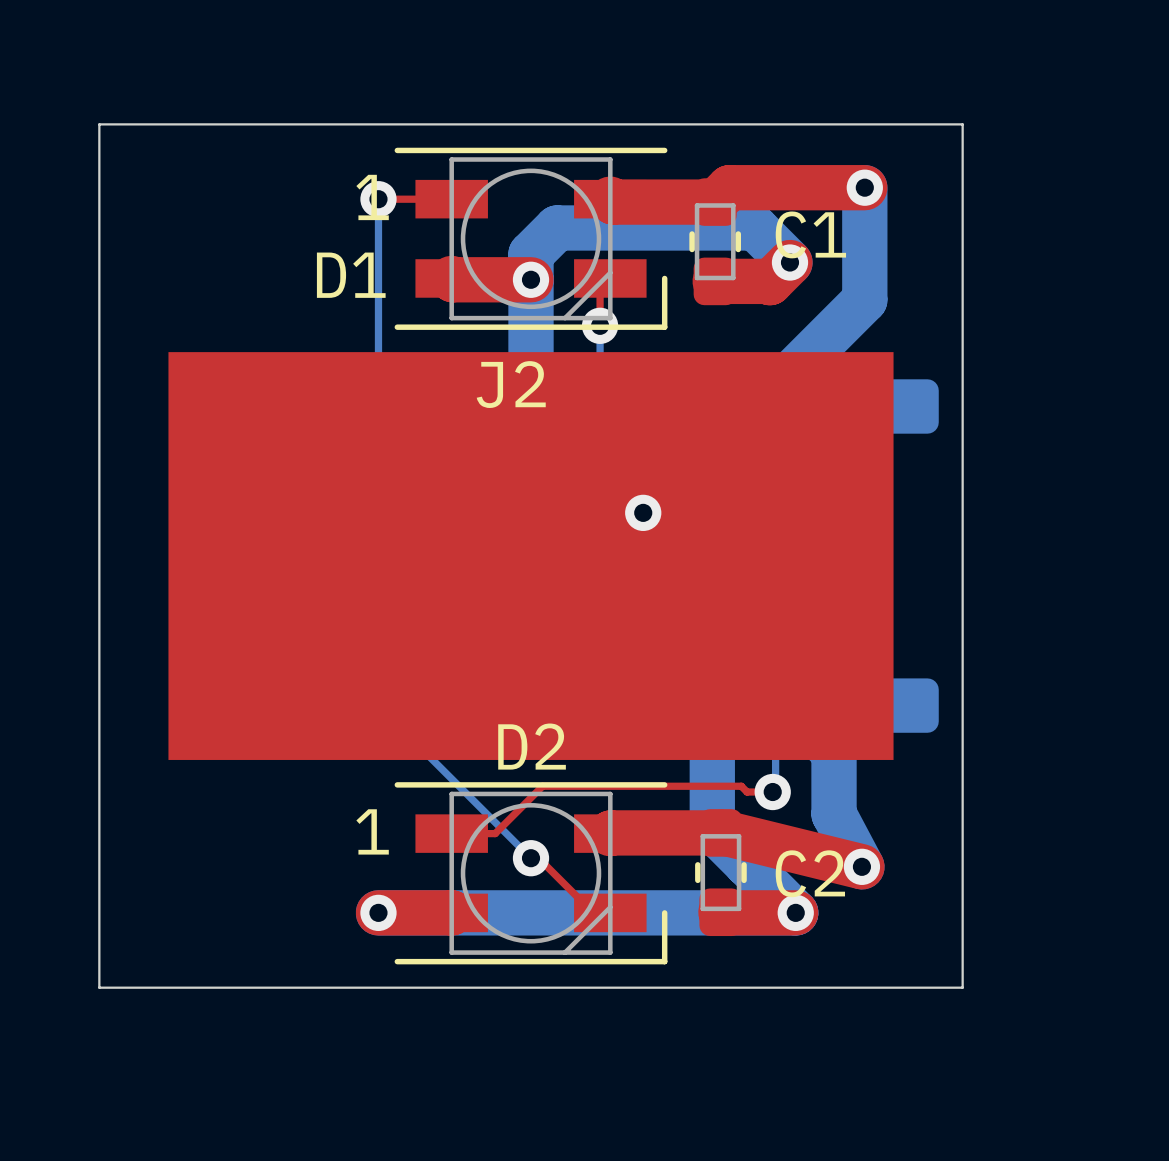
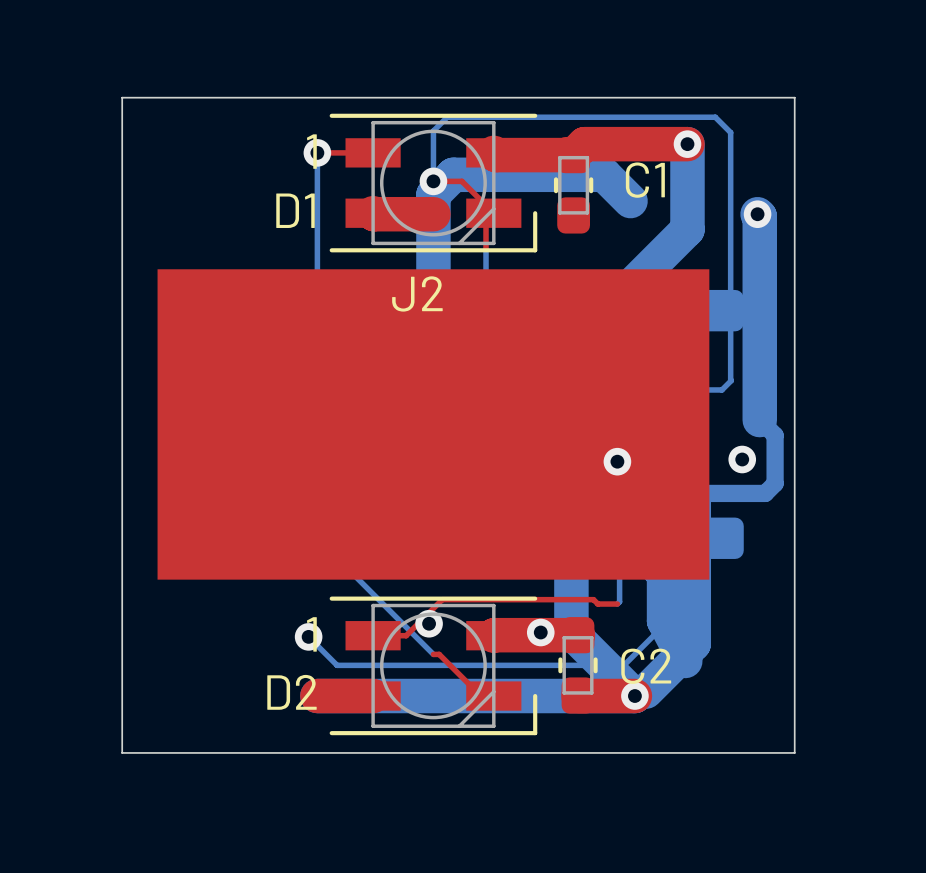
bottom track: none -> (433, 181) (433, 131) (447, 117) (715, 117) (730, 132) (731, 380) (721, 389) (693, 389)
top track: none -> (433, 181) (461, 181) (493, 213)
top track: (789, 262) (769, 282) (715, 281) -> none
via: (789, 262) -> none
via position: (531, 279) -> (433, 181)
bottom track: none -> (757, 214) (759, 216) (759, 420) (775, 435) (775, 483) (765, 493) (693, 493) (693, 643) (645, 691)
via: none -> (757, 214)
via: (600, 325) -> none
via: (643, 512) -> none
bottom track: none -> (693, 424) (661, 424) (645, 439) (645, 507) (654, 516) (654, 634) (623, 665) (337, 665) (308, 636)
via: none -> (742, 459)
via: none -> (617, 461)
D2 name position: D2 (532, 746) -> D2 (291, 692)
via: (772, 792) -> none
via: none -> (540, 632)
top track: (721, 832) (861, 866) -> none
via position: (531, 858) -> (429, 623)
via: (861, 866) -> none
via position: (378, 912) -> (308, 636)
board edge: (122, 987) (99, 987) (99, 124) (962, 124) (962, 987) -> (122, 752) (122, 97) (794, 97) (794, 752) (761, 752)

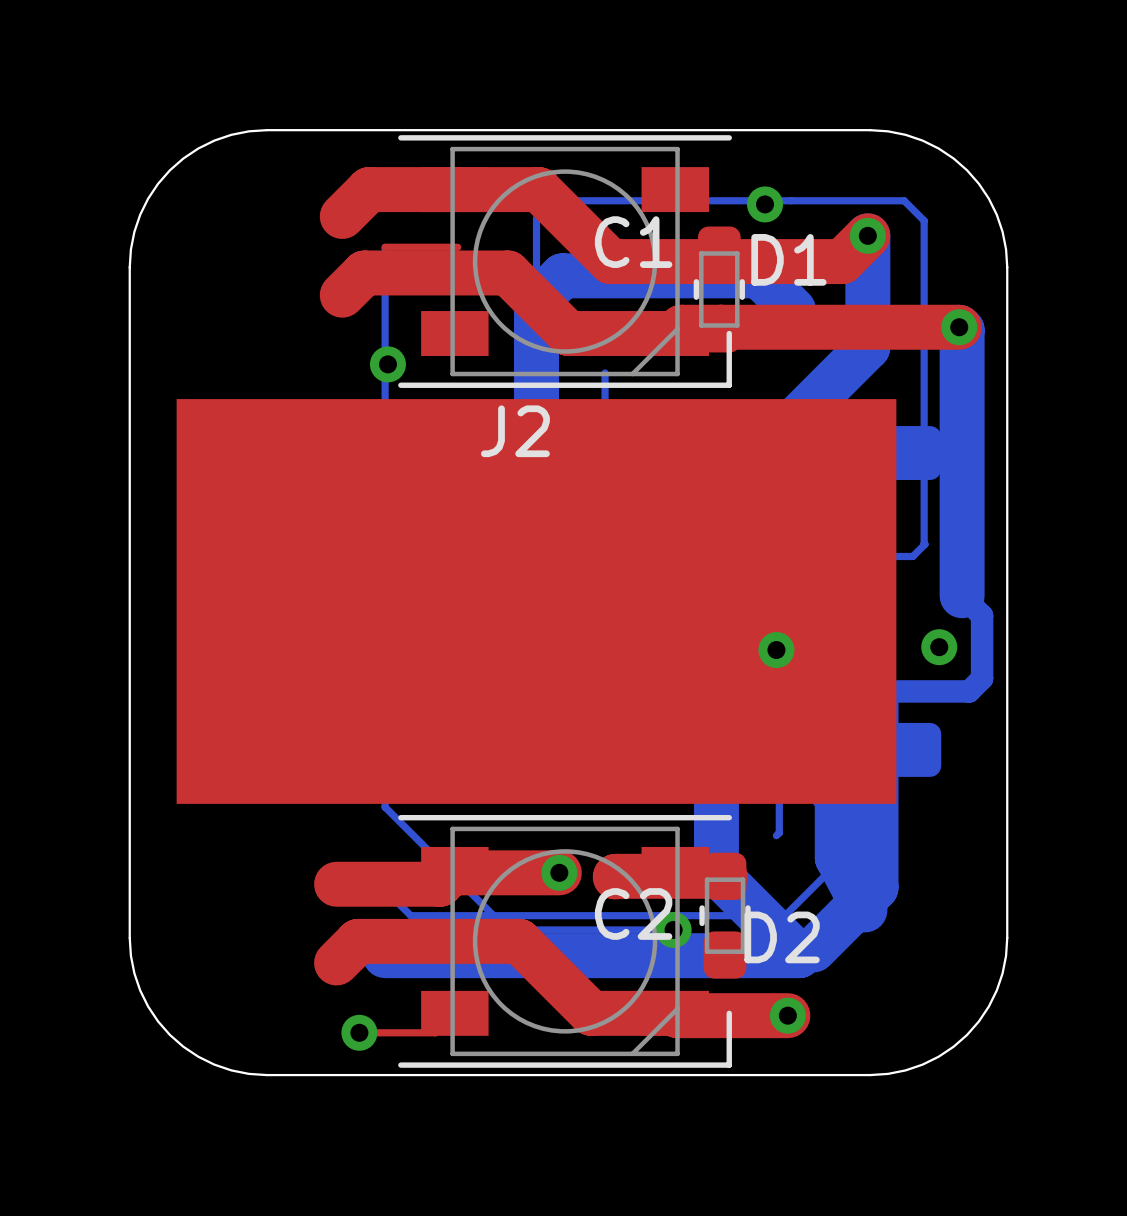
board edge: (122, 97) (794, 97) (794, 752) (122, 752) (122, 97) -> (266, 130) (248, 131) (214, 140) (198, 148) (169, 170) (148, 198) (140, 214) (130, 249) (129, 937) (134, 973) (140, 990) (158, 1021) (169, 1034) (198, 1056) (231, 1070) (266, 1075) (870, 1075) (888, 1073) (922, 1064) (953, 1046) (978, 1021) (988, 1006) (1002, 973) (1007, 937) (1007, 267) (1002, 231) (996, 214) (978, 183) (967, 170) (938, 148) (922, 140) (888, 131) (266, 130)
D1 footprint: [329, 113, 538, 253] -> [398, 135, 732, 388]
via: none -> (765, 204)
top track: (687, 144) (584, 144) (573, 155) (496, 155) (493, 152) -> (867, 235) (842, 261) (610, 261) (538, 189) (369, 189) (342, 216)
via: (317, 152) -> none
C1 name position: C1 (645, 180) -> C1 (633, 242)
top track: (433, 181) (461, 181) (493, 213) (486, 221) (486, 249) -> none
via: (433, 181) -> none
top track: none -> (342, 295) (364, 272) (507, 272) (568, 333) (675, 333) (681, 327) (959, 327)
D1 name position: D1 (295, 210) -> D1 (788, 259)
top track: (373, 213) (433, 214) -> none
via: none -> (387, 364)
bottom track: (317, 538) (433, 654) -> (385, 750) (385, 807) (507, 929) (673, 929)
D2 footprint: [329, 596, 538, 736] -> [398, 814, 732, 1068]
top track: (617, 604) (597, 604) (593, 599) (442, 599) (406, 635) (373, 635) -> none
via position: (429, 623) -> (559, 872)
top track: none -> (559, 872) (458, 872) (454, 869) (440, 884) (336, 884)
via position: (540, 632) -> (673, 929)
via: (308, 636) -> none
top track: (433, 654) (439, 654) (480, 696) (493, 696) -> none
C2 name position: C2 (646, 666) -> C2 (633, 914)
D2 name position: D2 (291, 692) -> D2 (782, 937)
top track: (317, 696) (373, 696) -> none
top track: (578, 696) (634, 696) -> none
via position: (634, 696) -> (787, 1015)
top track: none -> (336, 962) (358, 941) (519, 941) (591, 1013) (787, 1015)
top track: none -> (454, 1013) (435, 1032) (359, 1032)
via: none -> (359, 1032)

